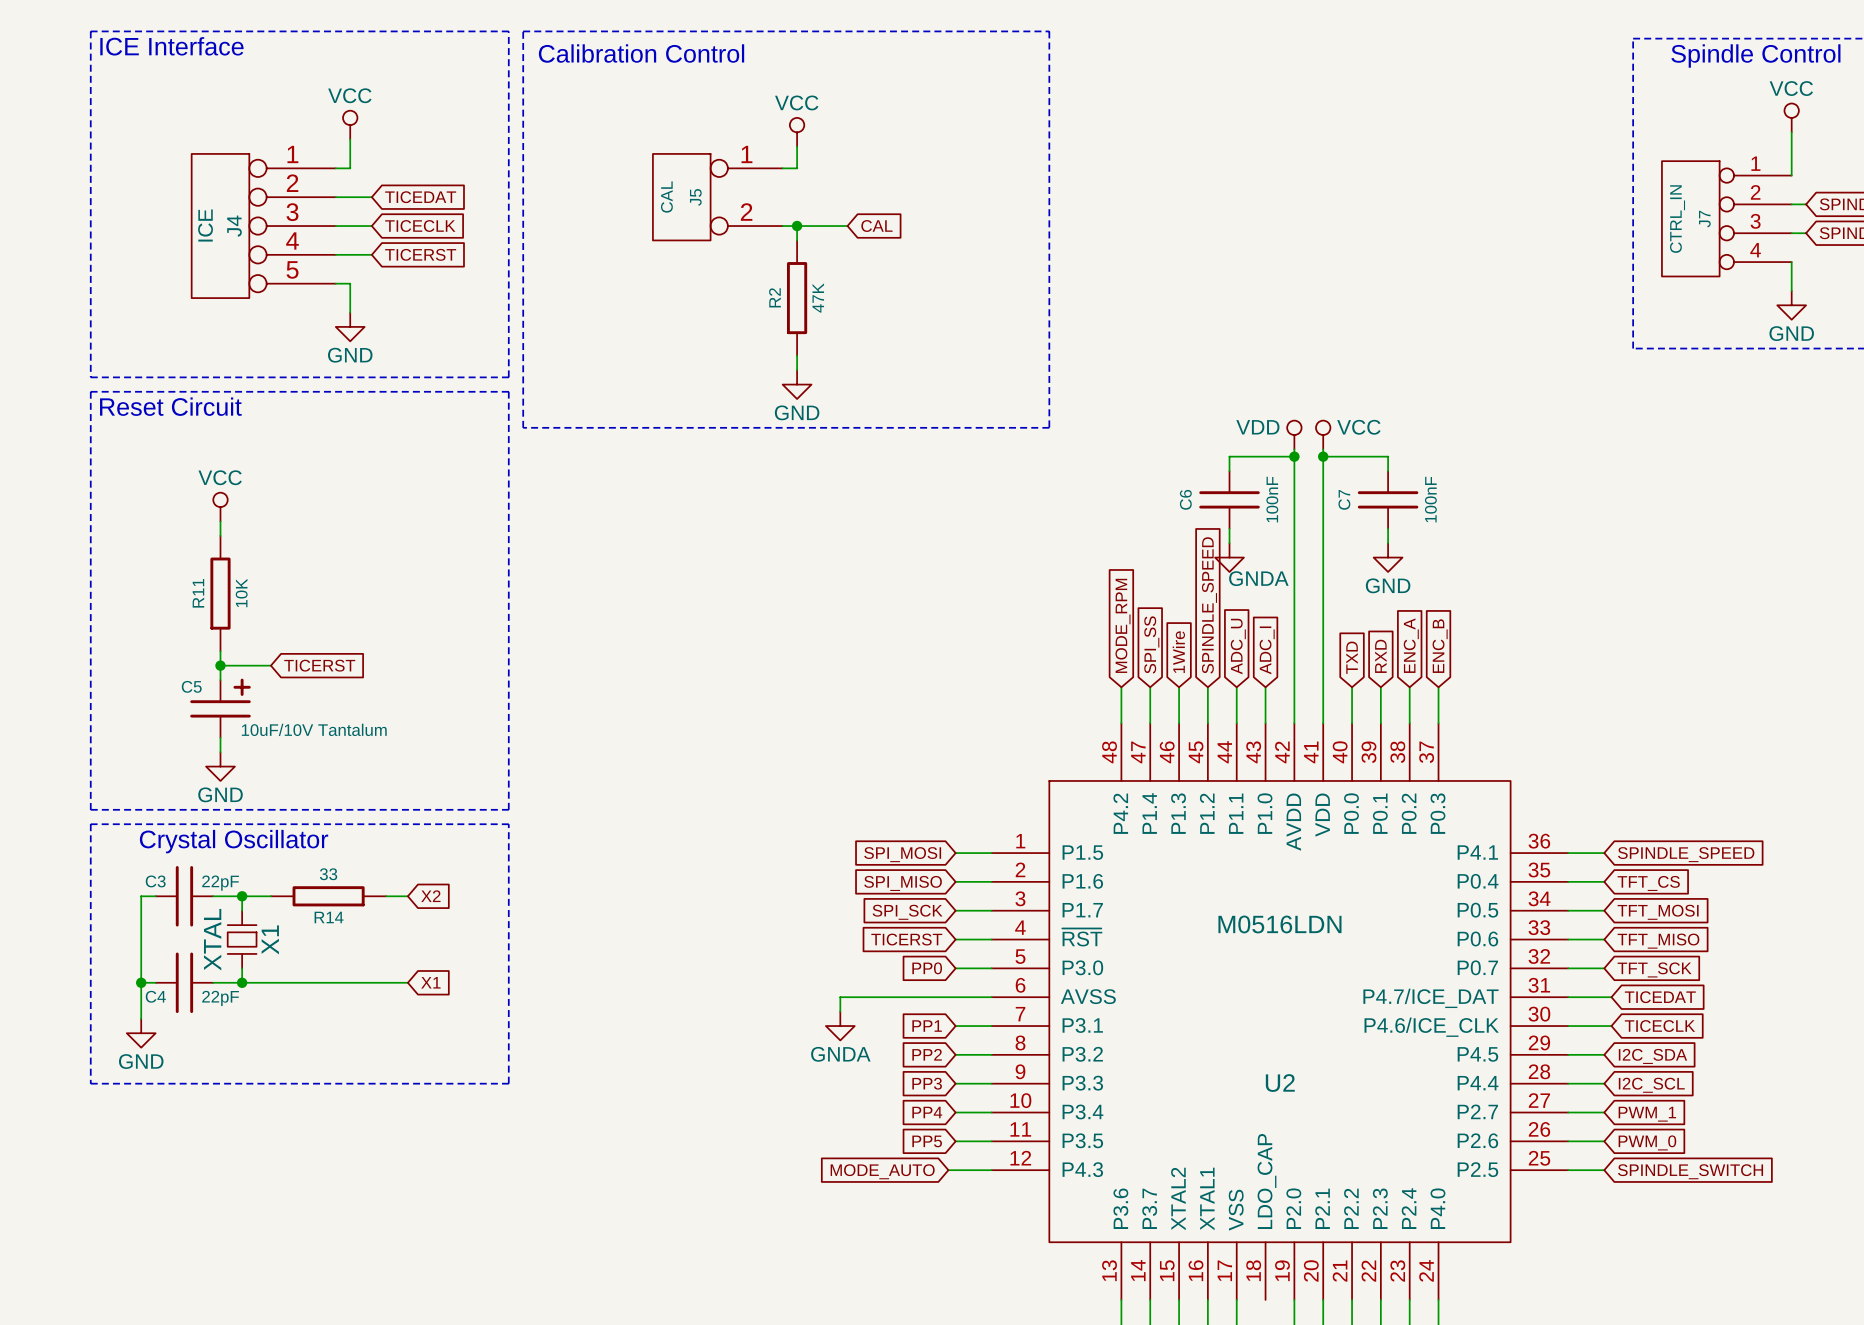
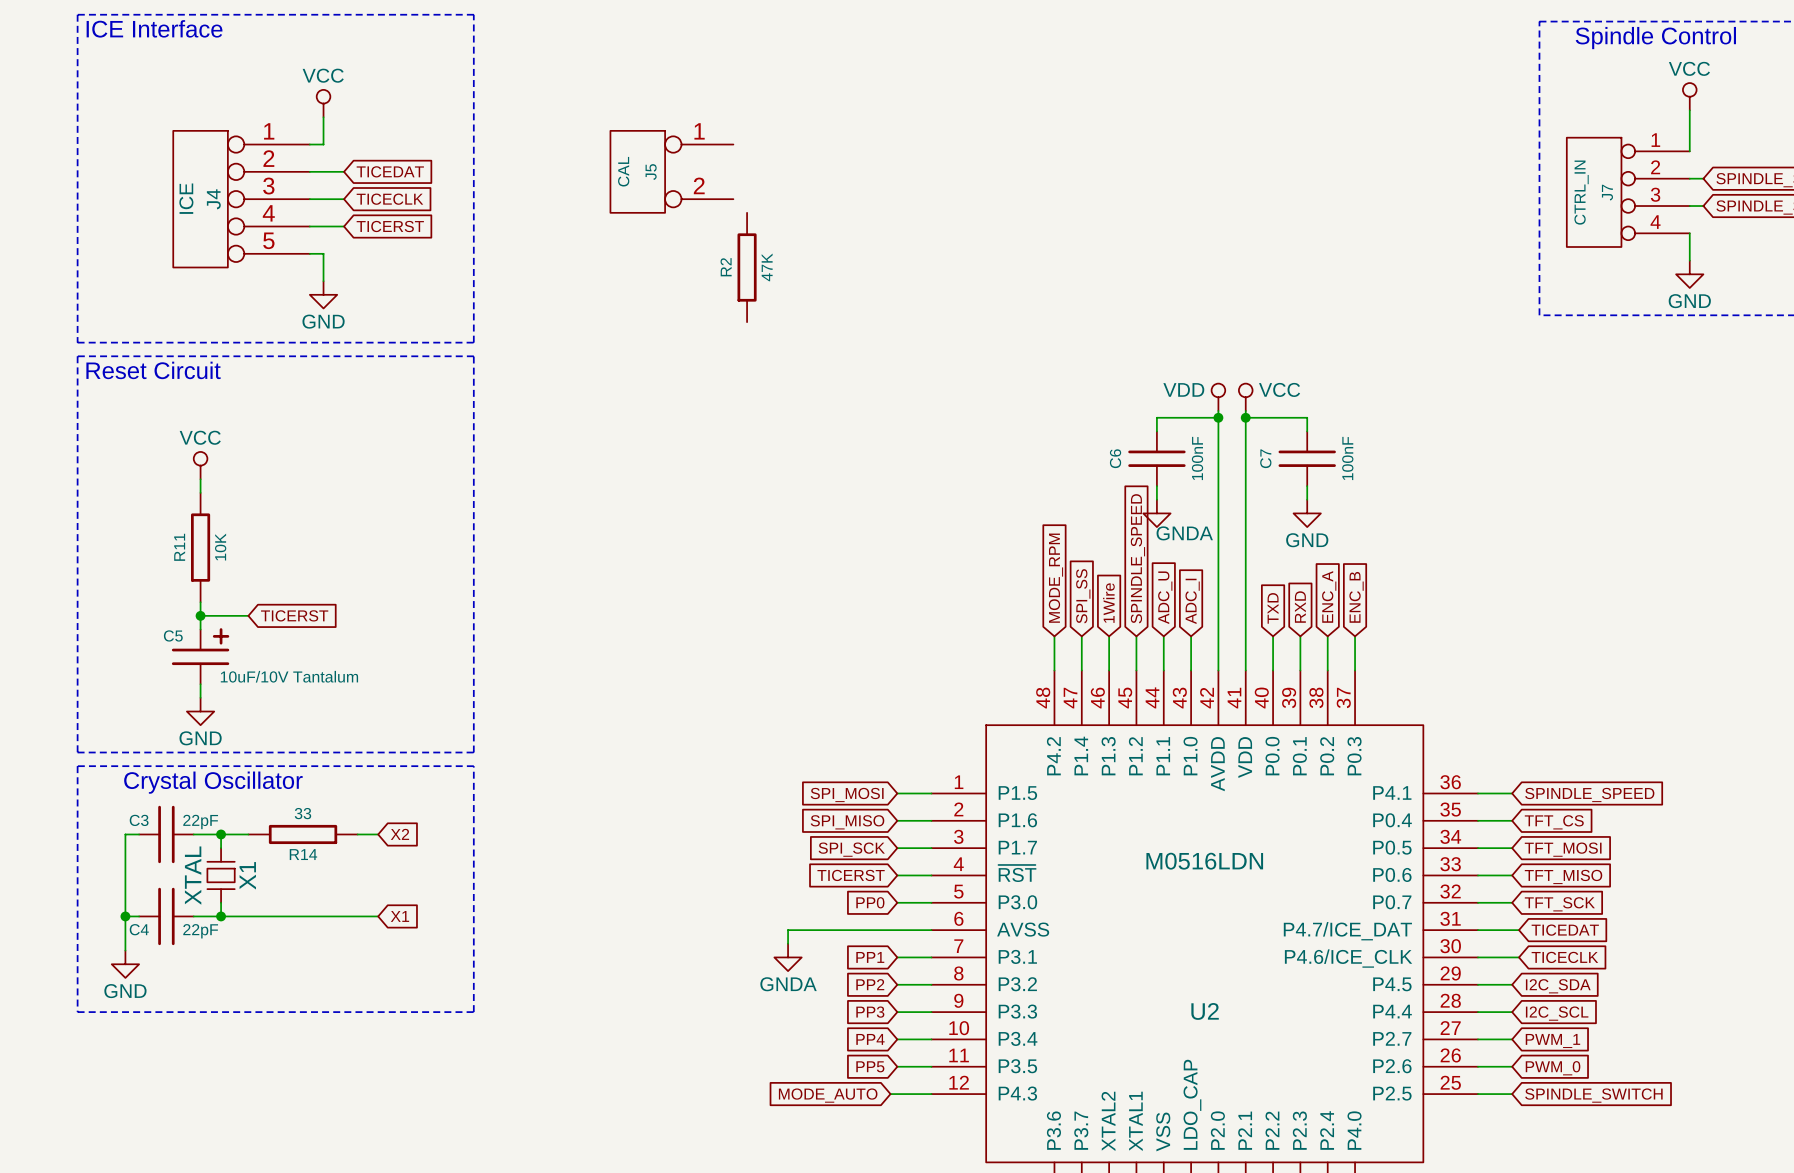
line: (523, 31) (1049, 31) (1049, 427) (523, 427) (523, 31) -> none
text: Calibration Control (641, 53) -> none
power symbol: VCC (797, 132) -> none
wire: (797, 146) (797, 168) (782, 168) -> none
wire: (782, 226) (847, 226) -> none
wire: (797, 226) (797, 240) -> none
junction: (797, 226) -> none
global label: CAL (876, 226) -> none
wire: (797, 355) (797, 370) -> none
power symbol: GND (797, 384) -> none

